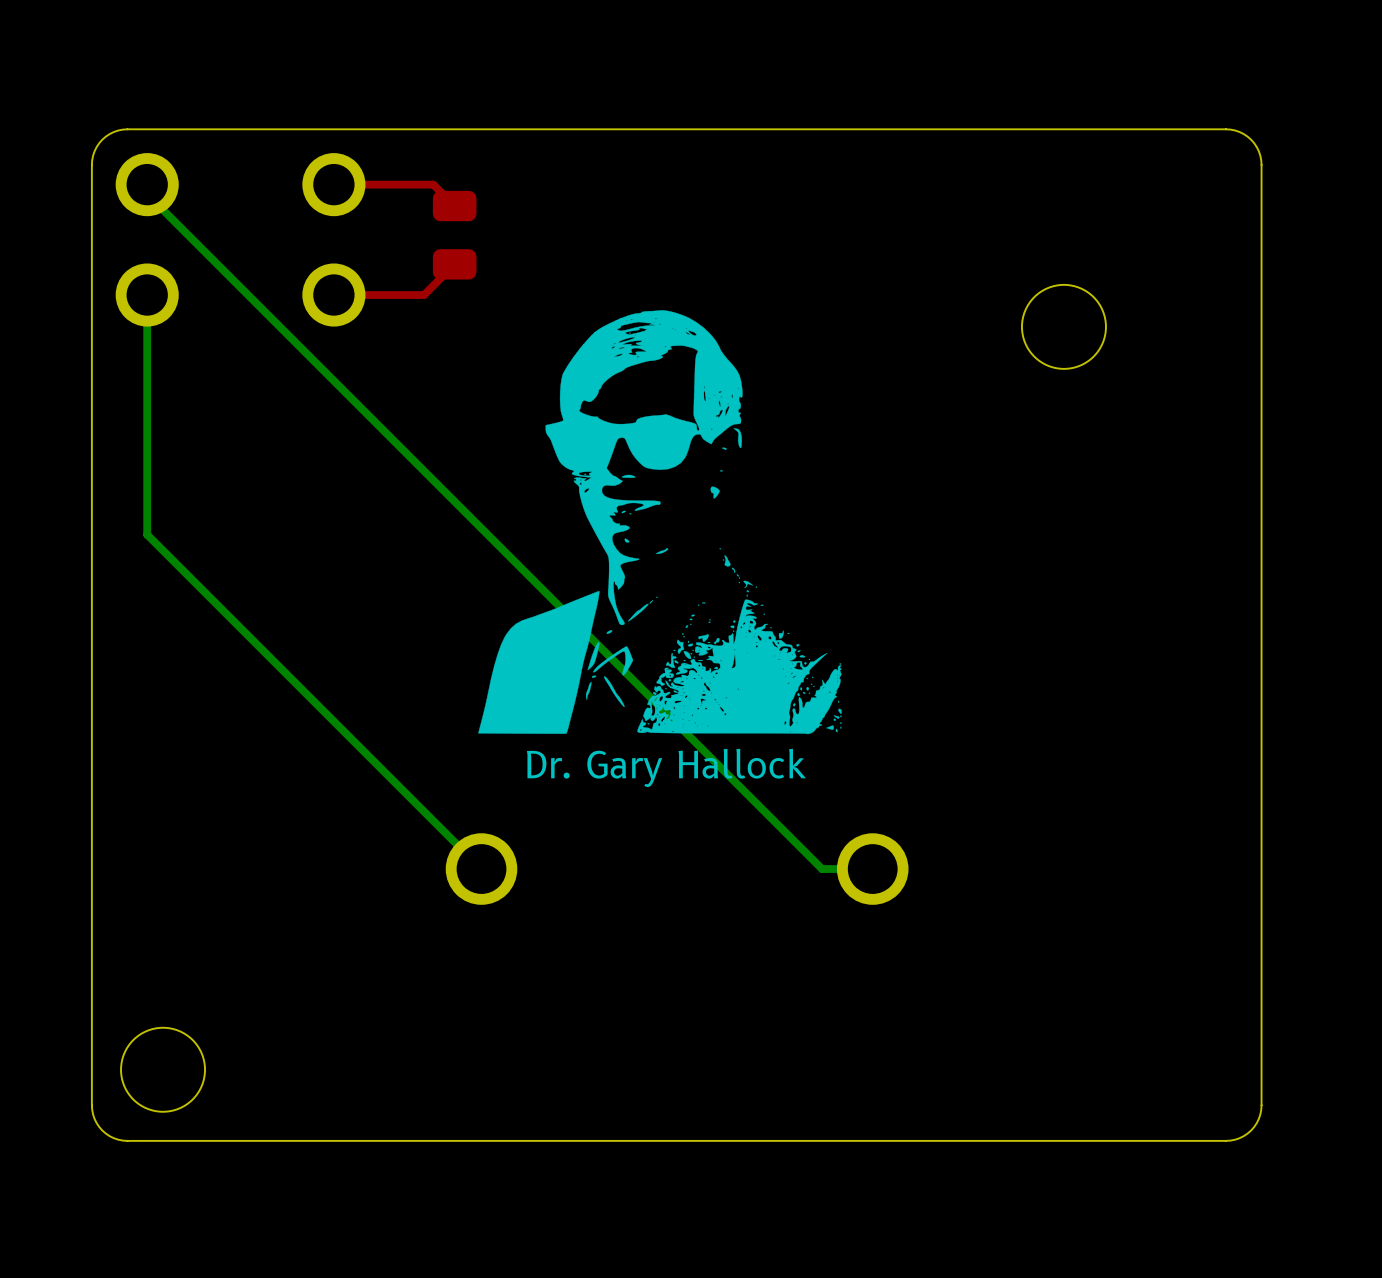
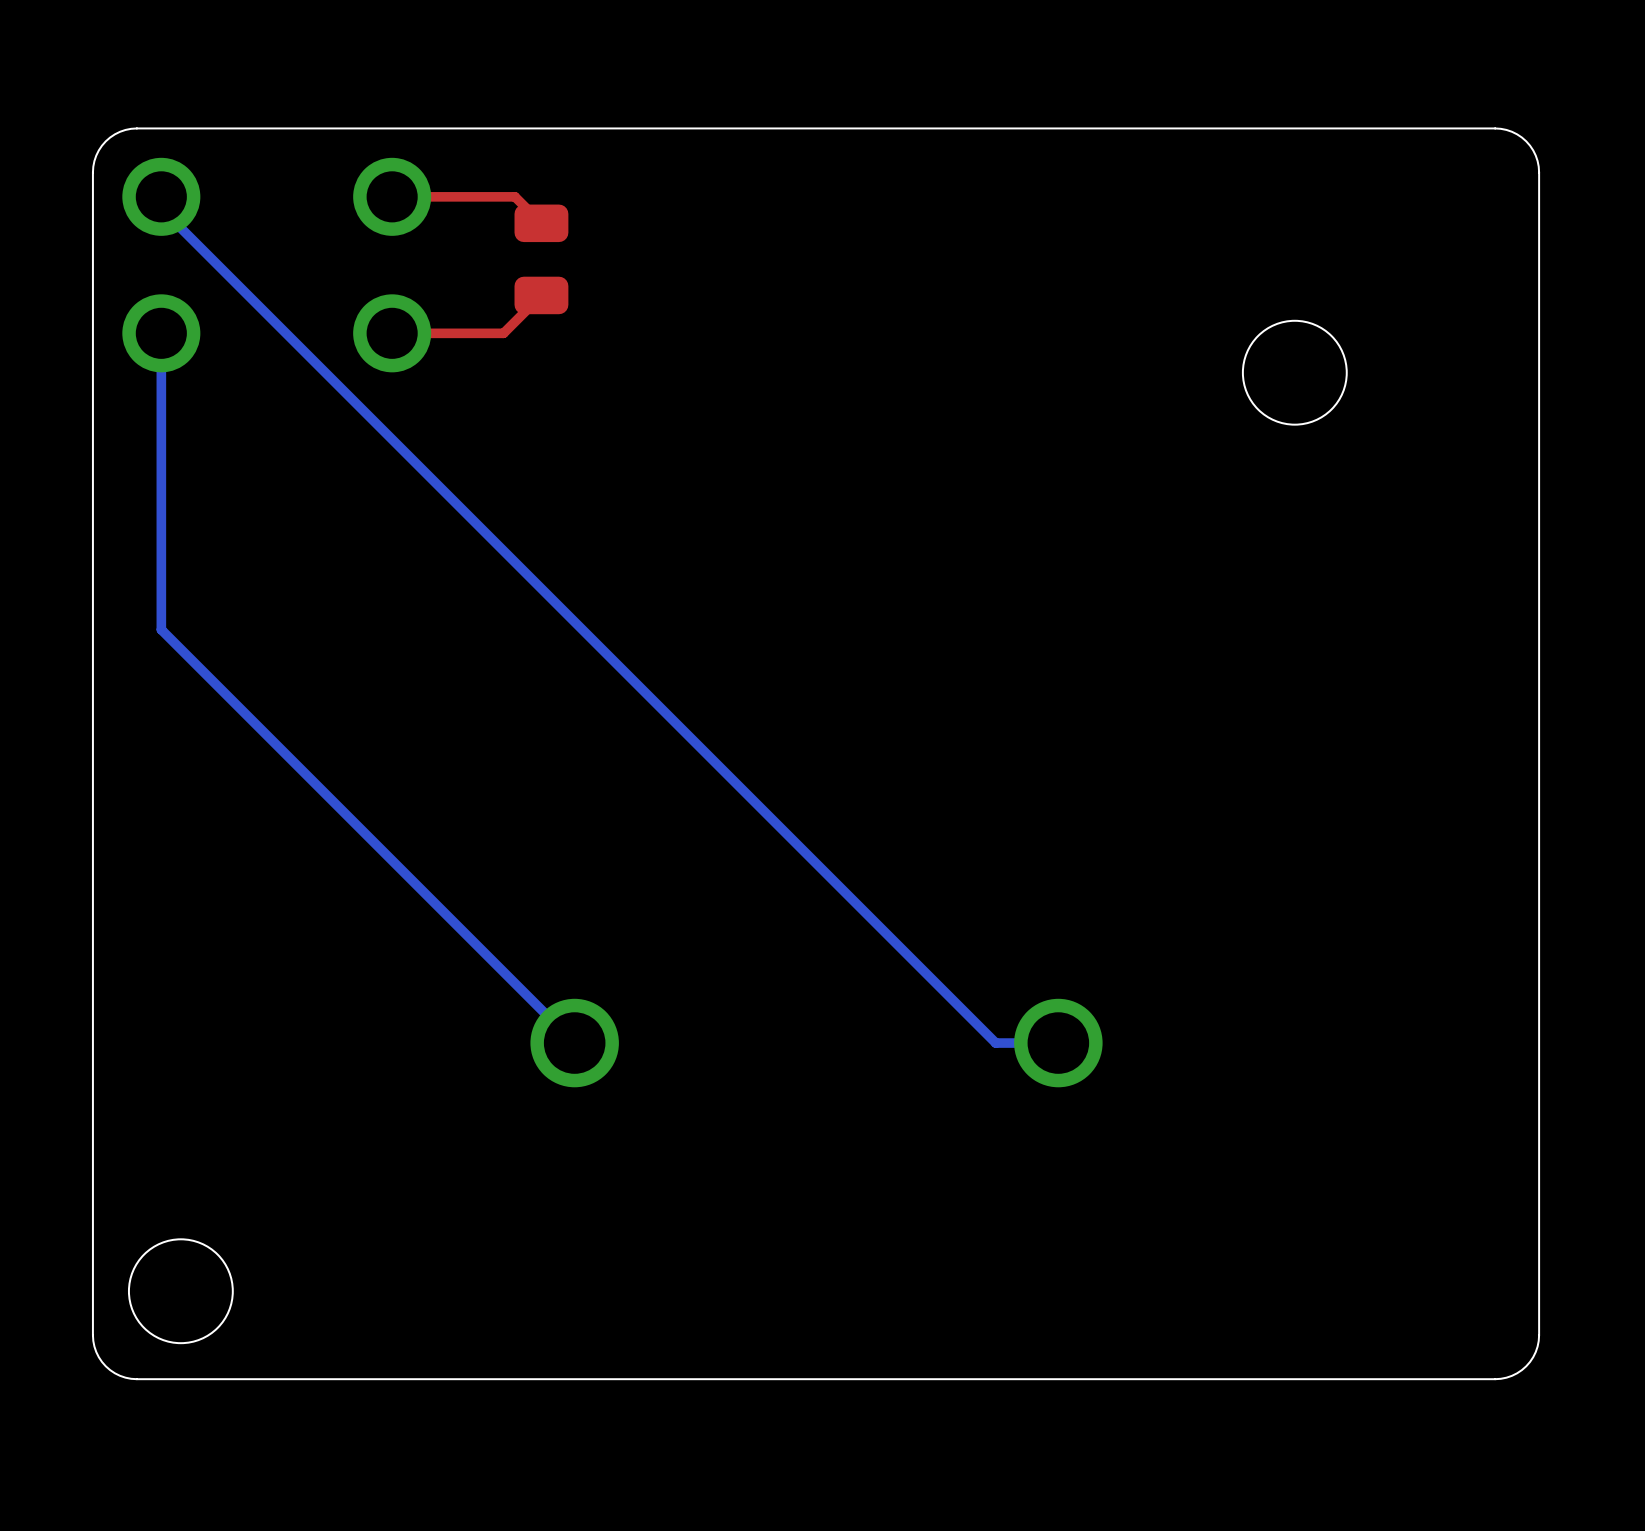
drawing: [478, 310, 842, 735] -> none
text: Dr. Gary Hallock (666, 767) -> none

